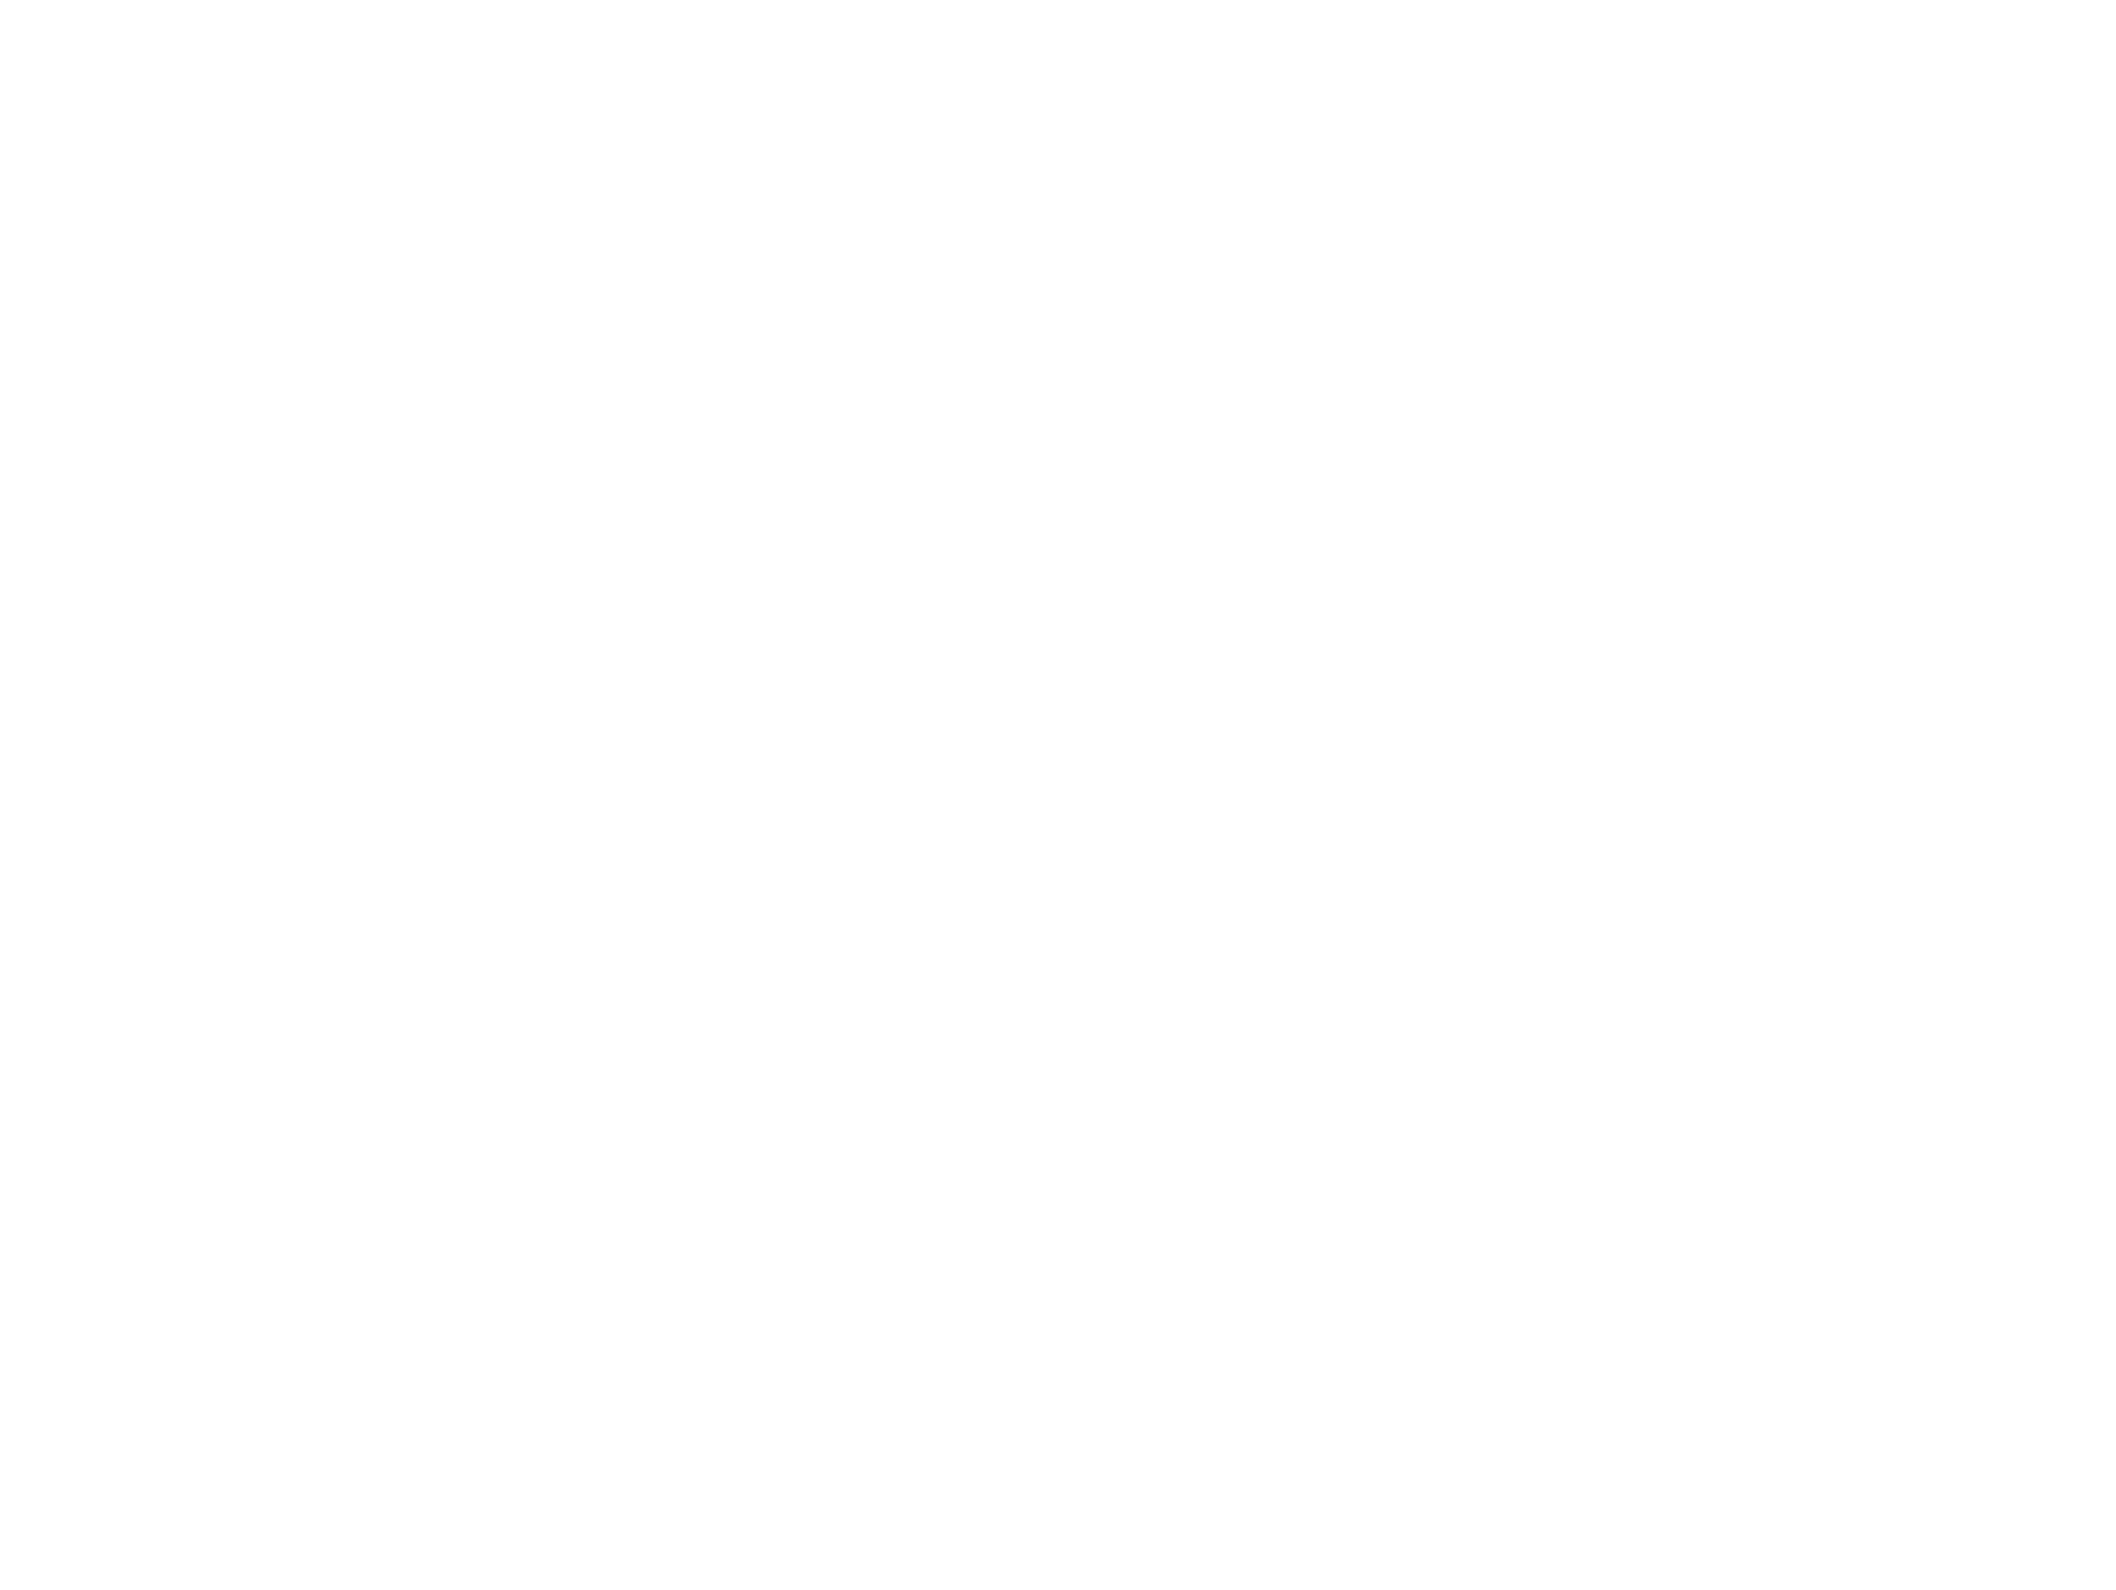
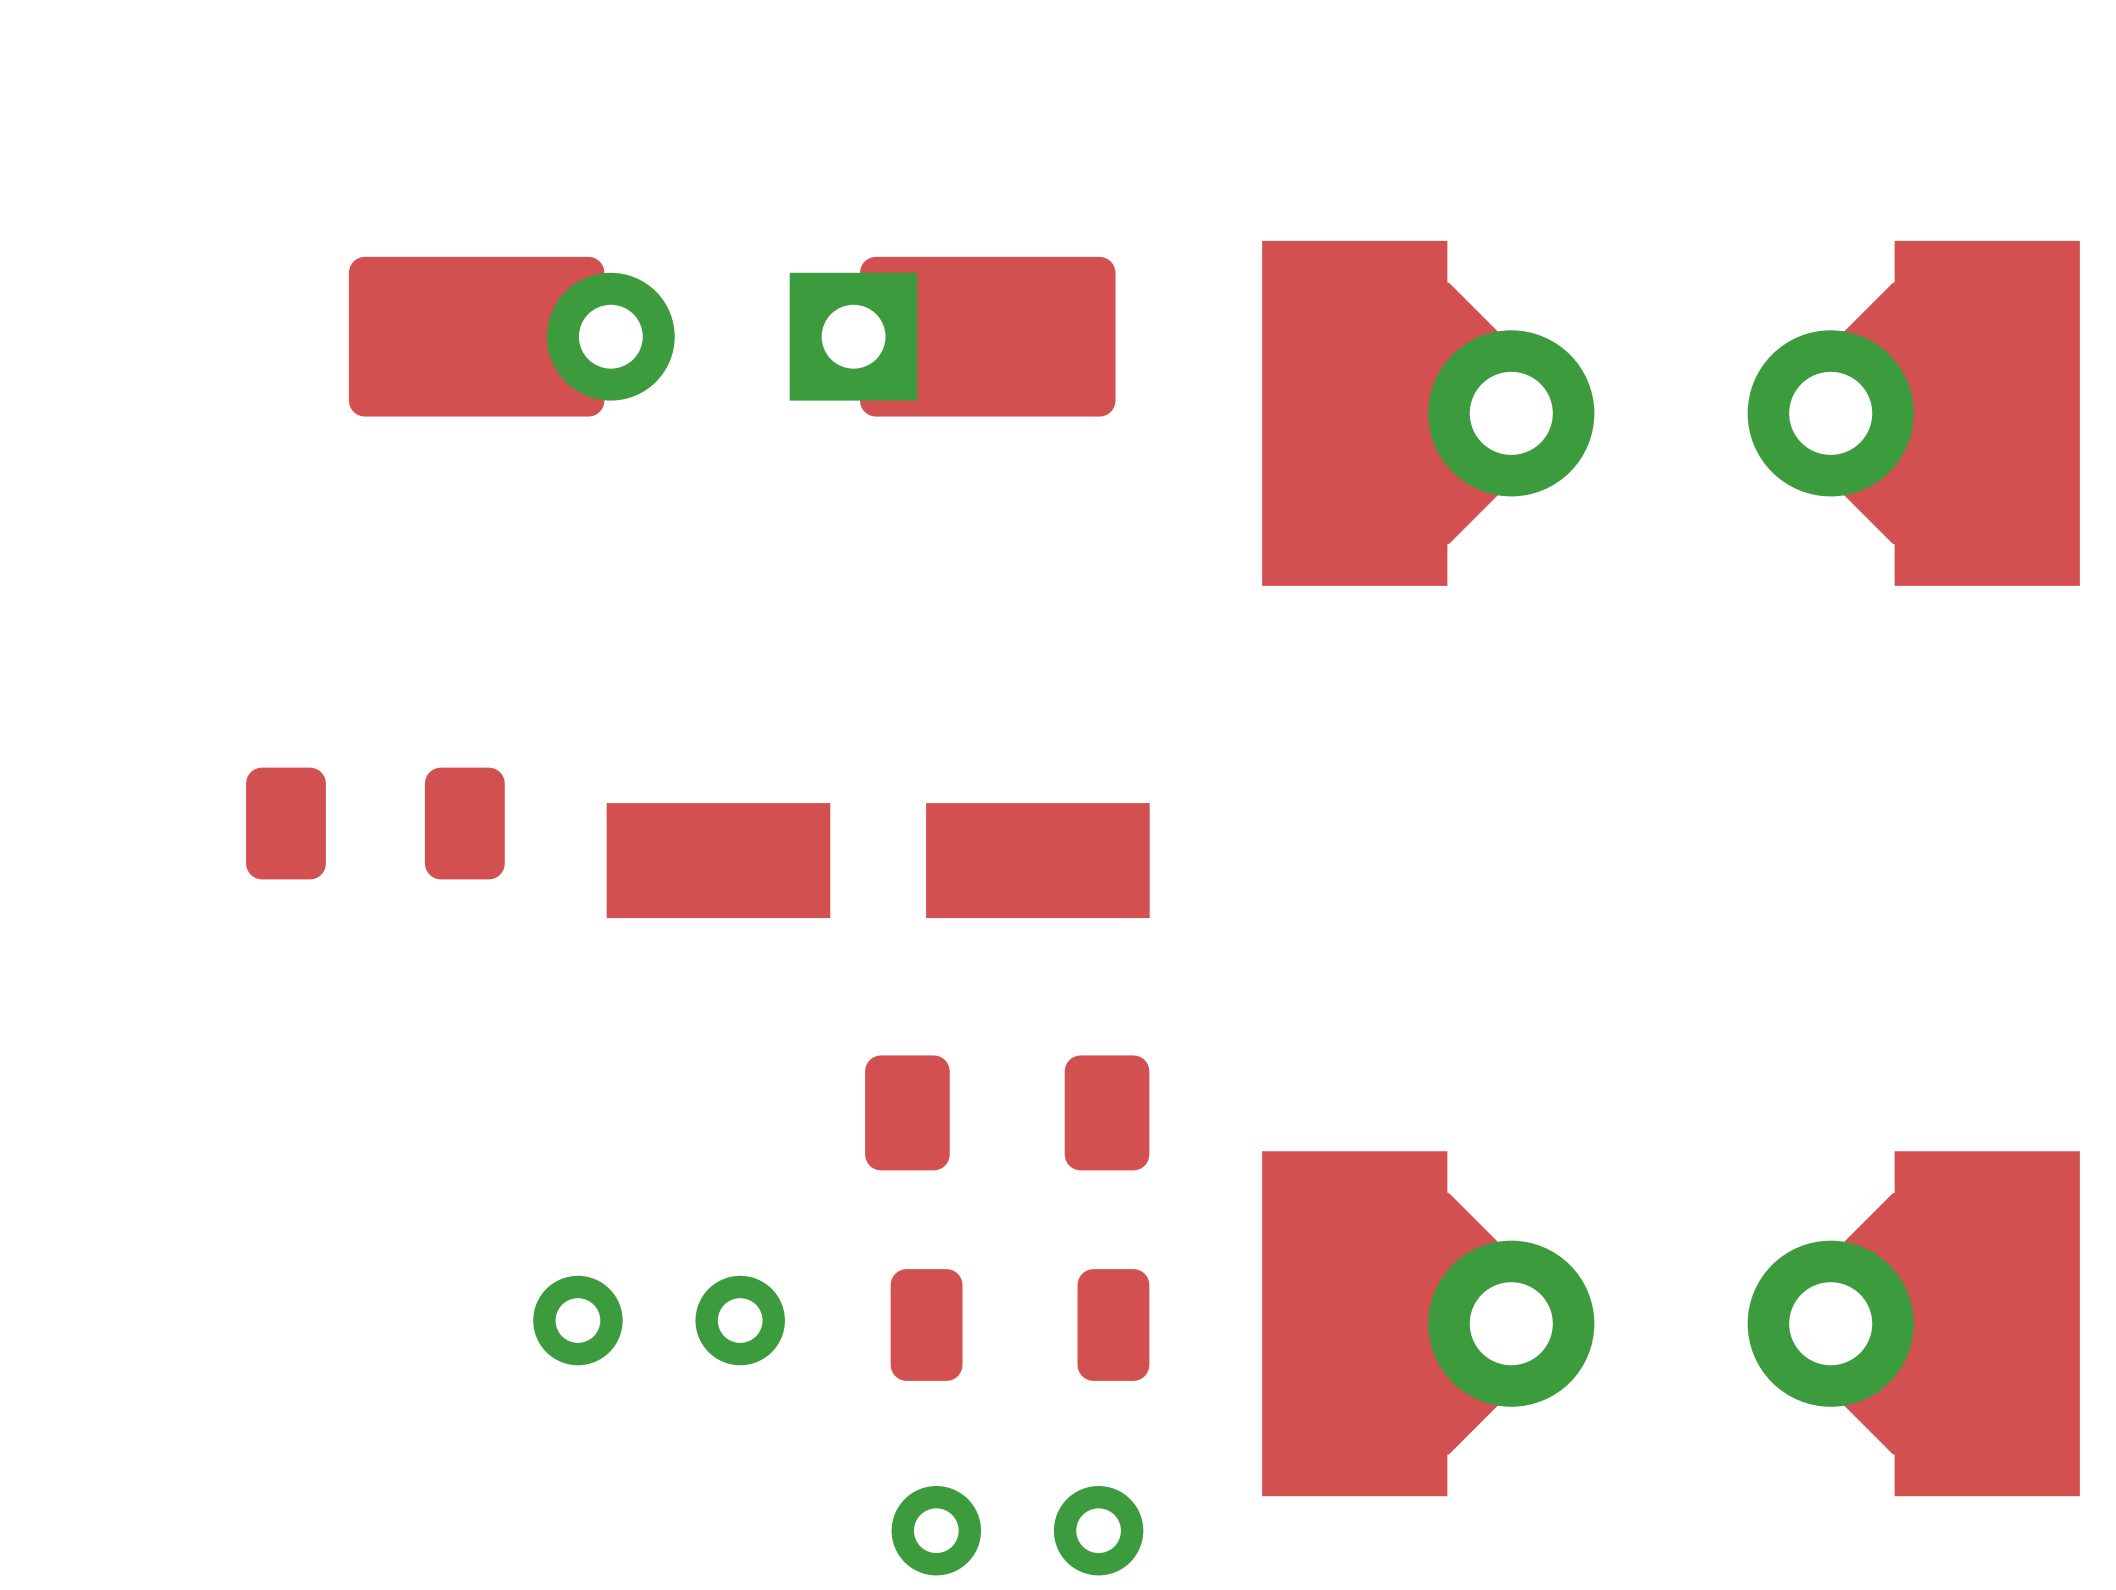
part: none -> (732, 336)
part: none -> (1671, 413)
part: none -> (375, 823)
part: none -> (878, 860)
part: none -> (1007, 1112)
part: none -> (659, 1320)
part: none -> (1671, 1323)
part: none -> (1020, 1325)
part: none -> (1017, 1530)

